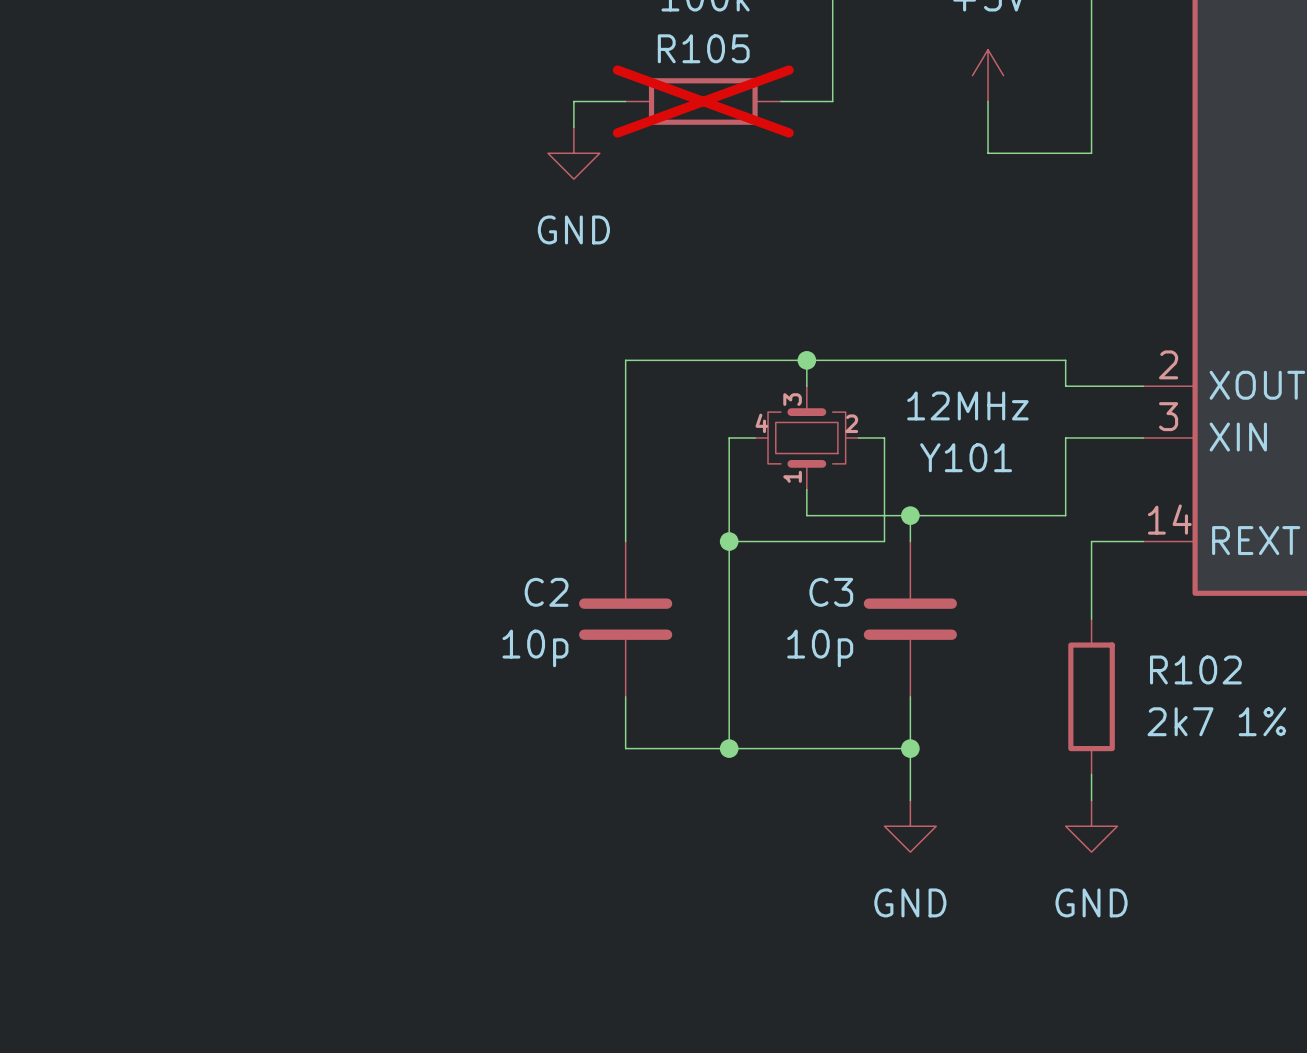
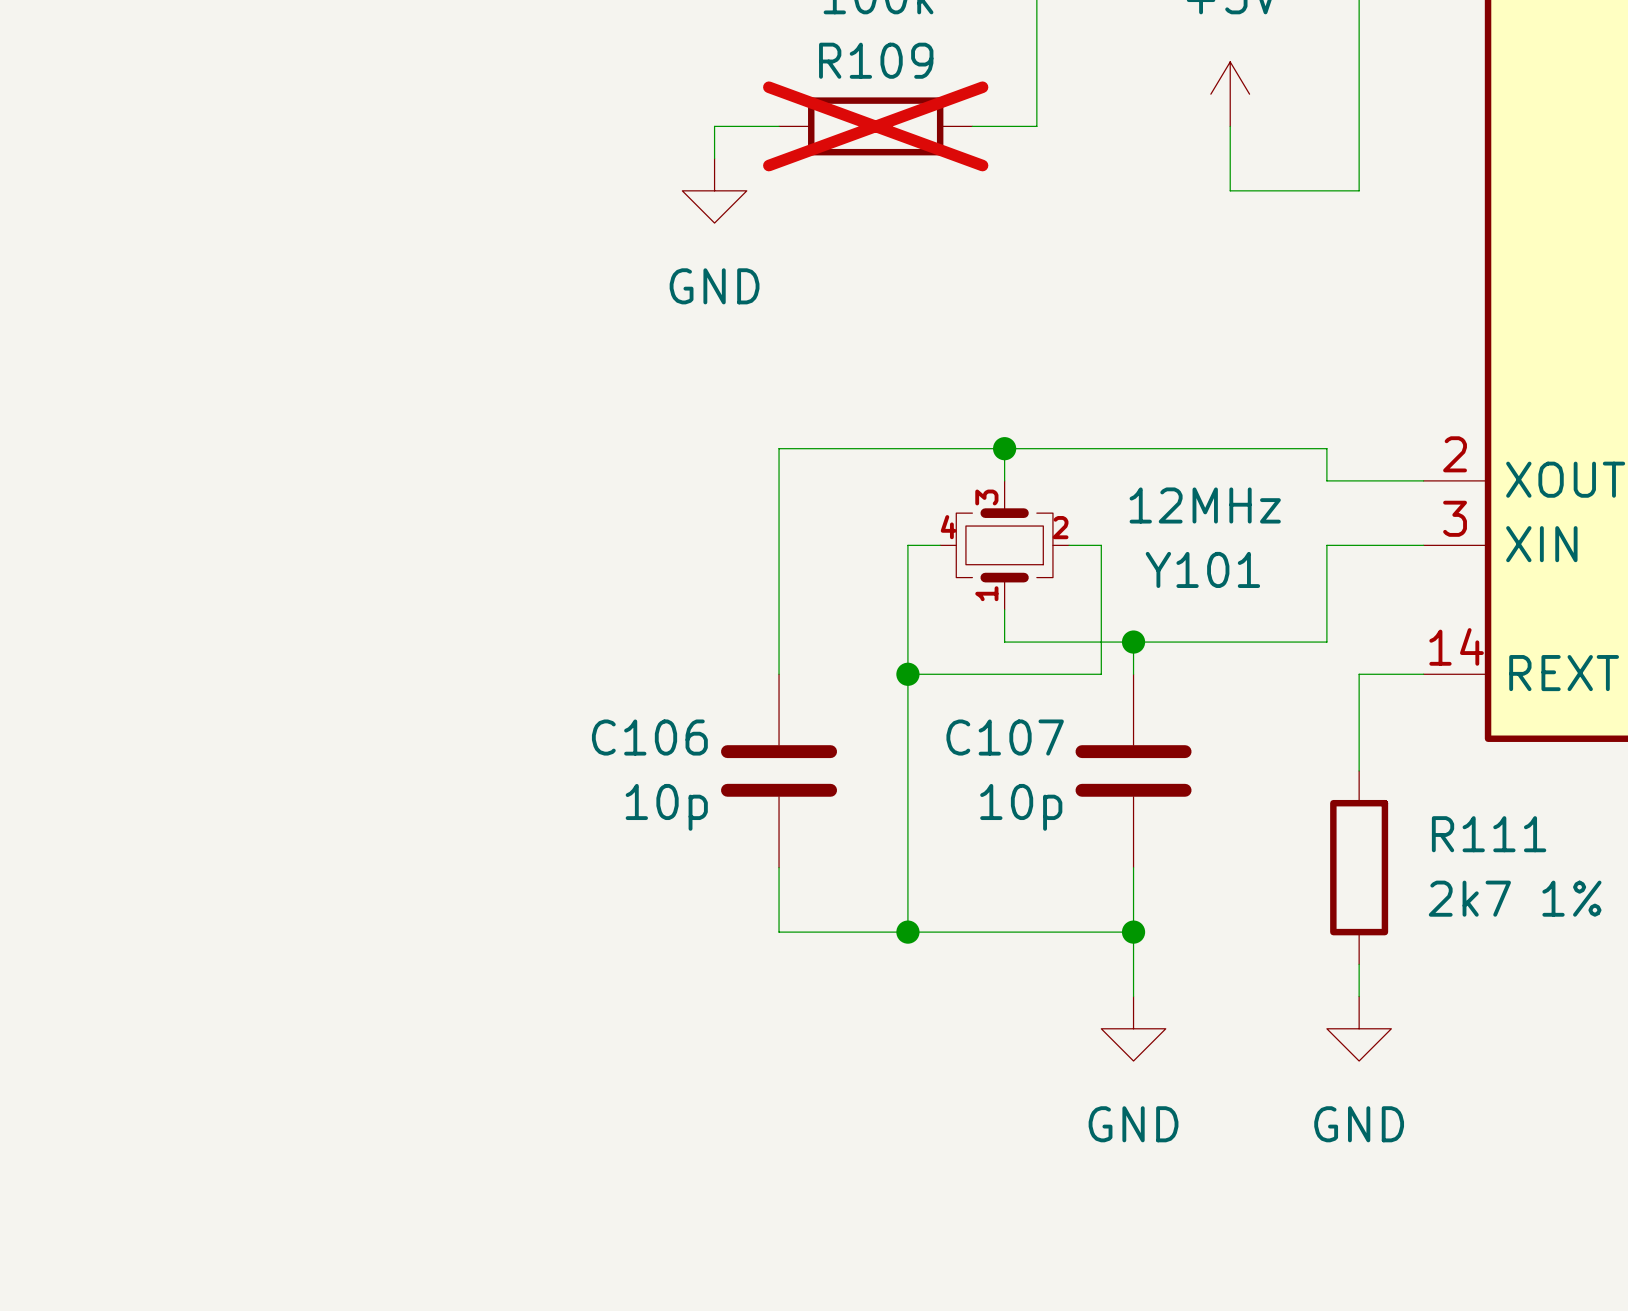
R105 name: R105 (703, 48) -> R109 (876, 60)
C2 name: C2 (546, 592) -> C106 (649, 737)
C3 name: C3 (831, 592) -> C107 (1005, 737)
R102 name: R102 (1195, 669) -> R111 (1489, 834)

